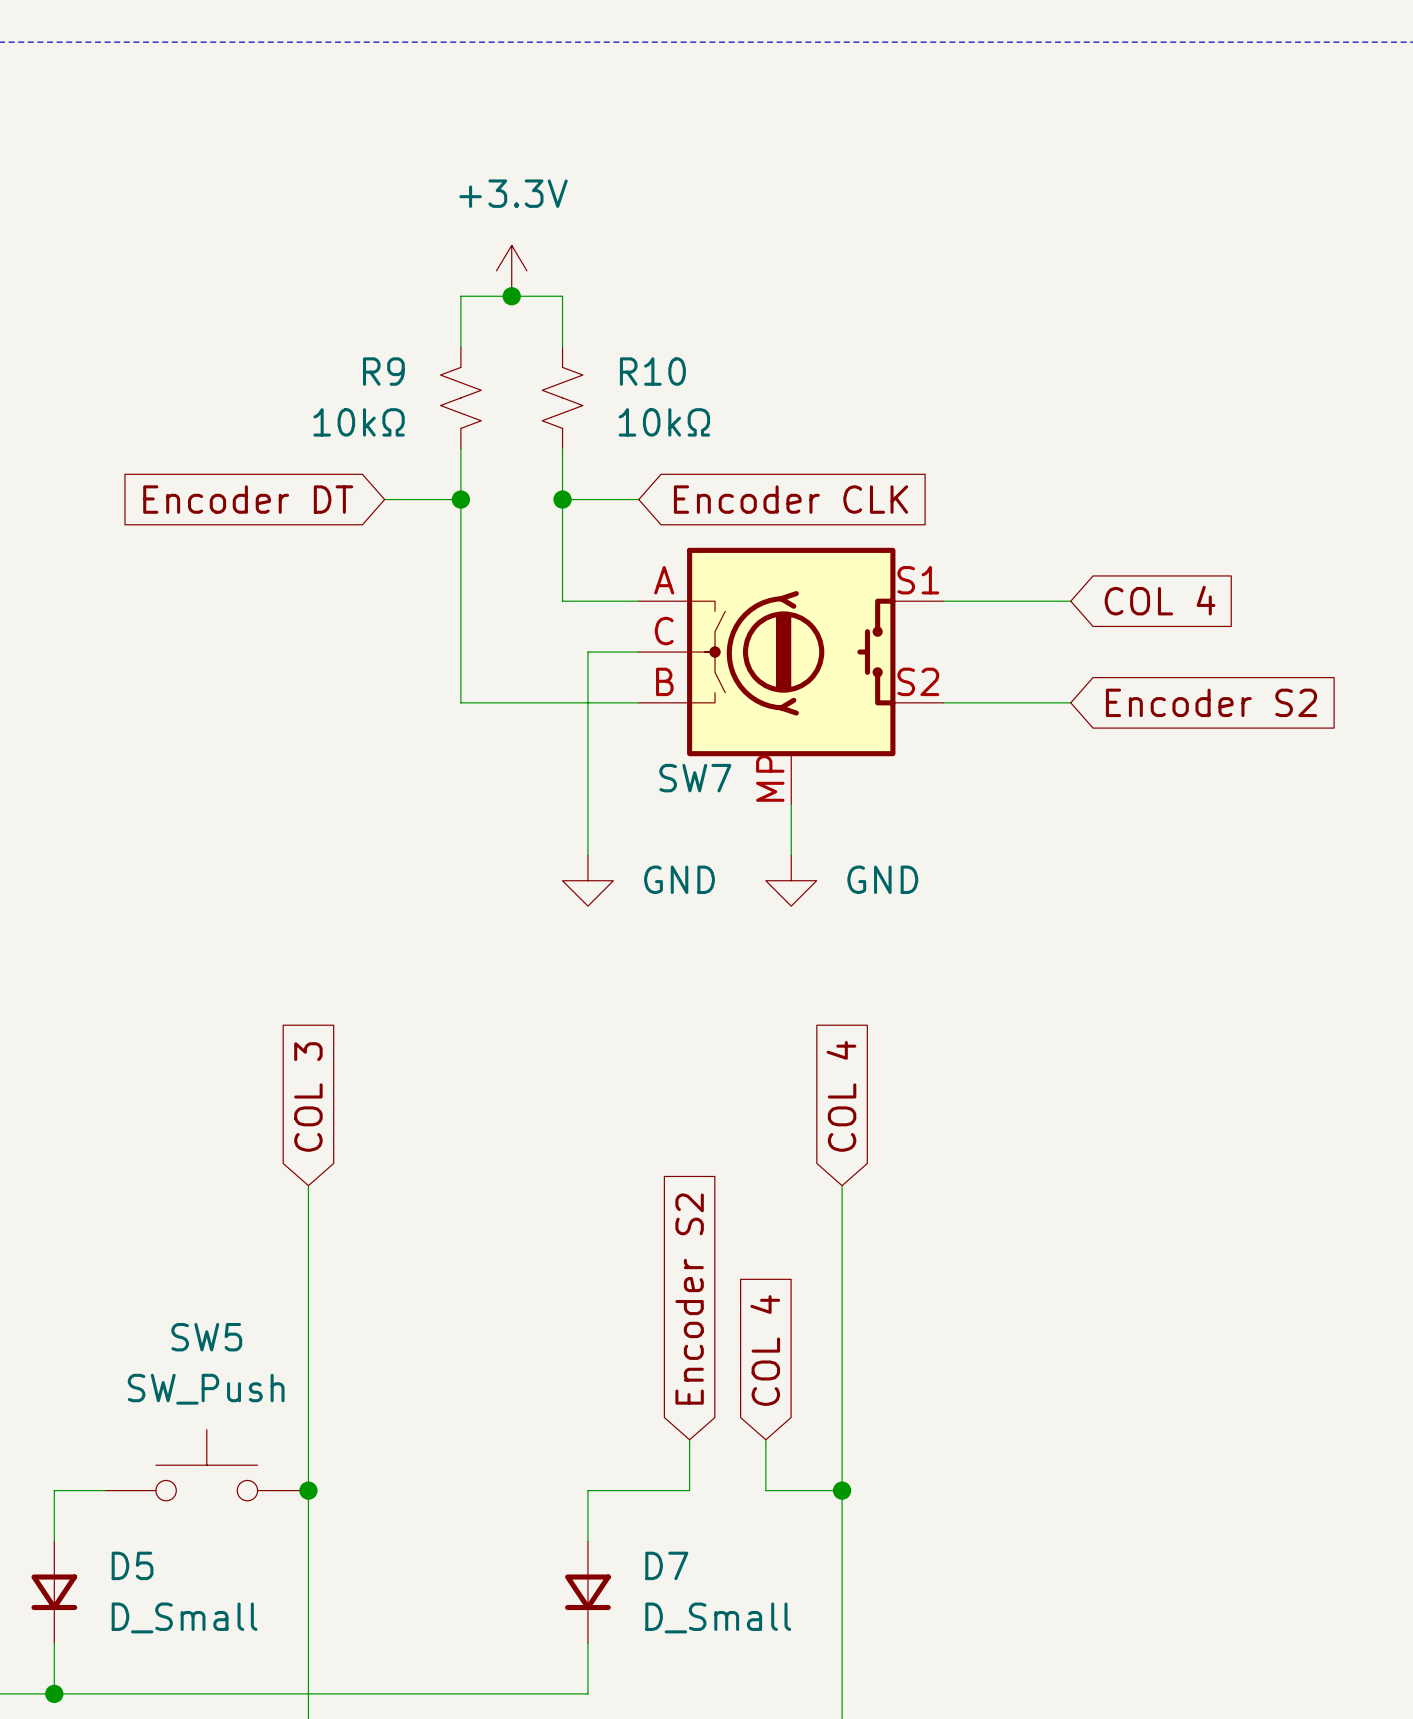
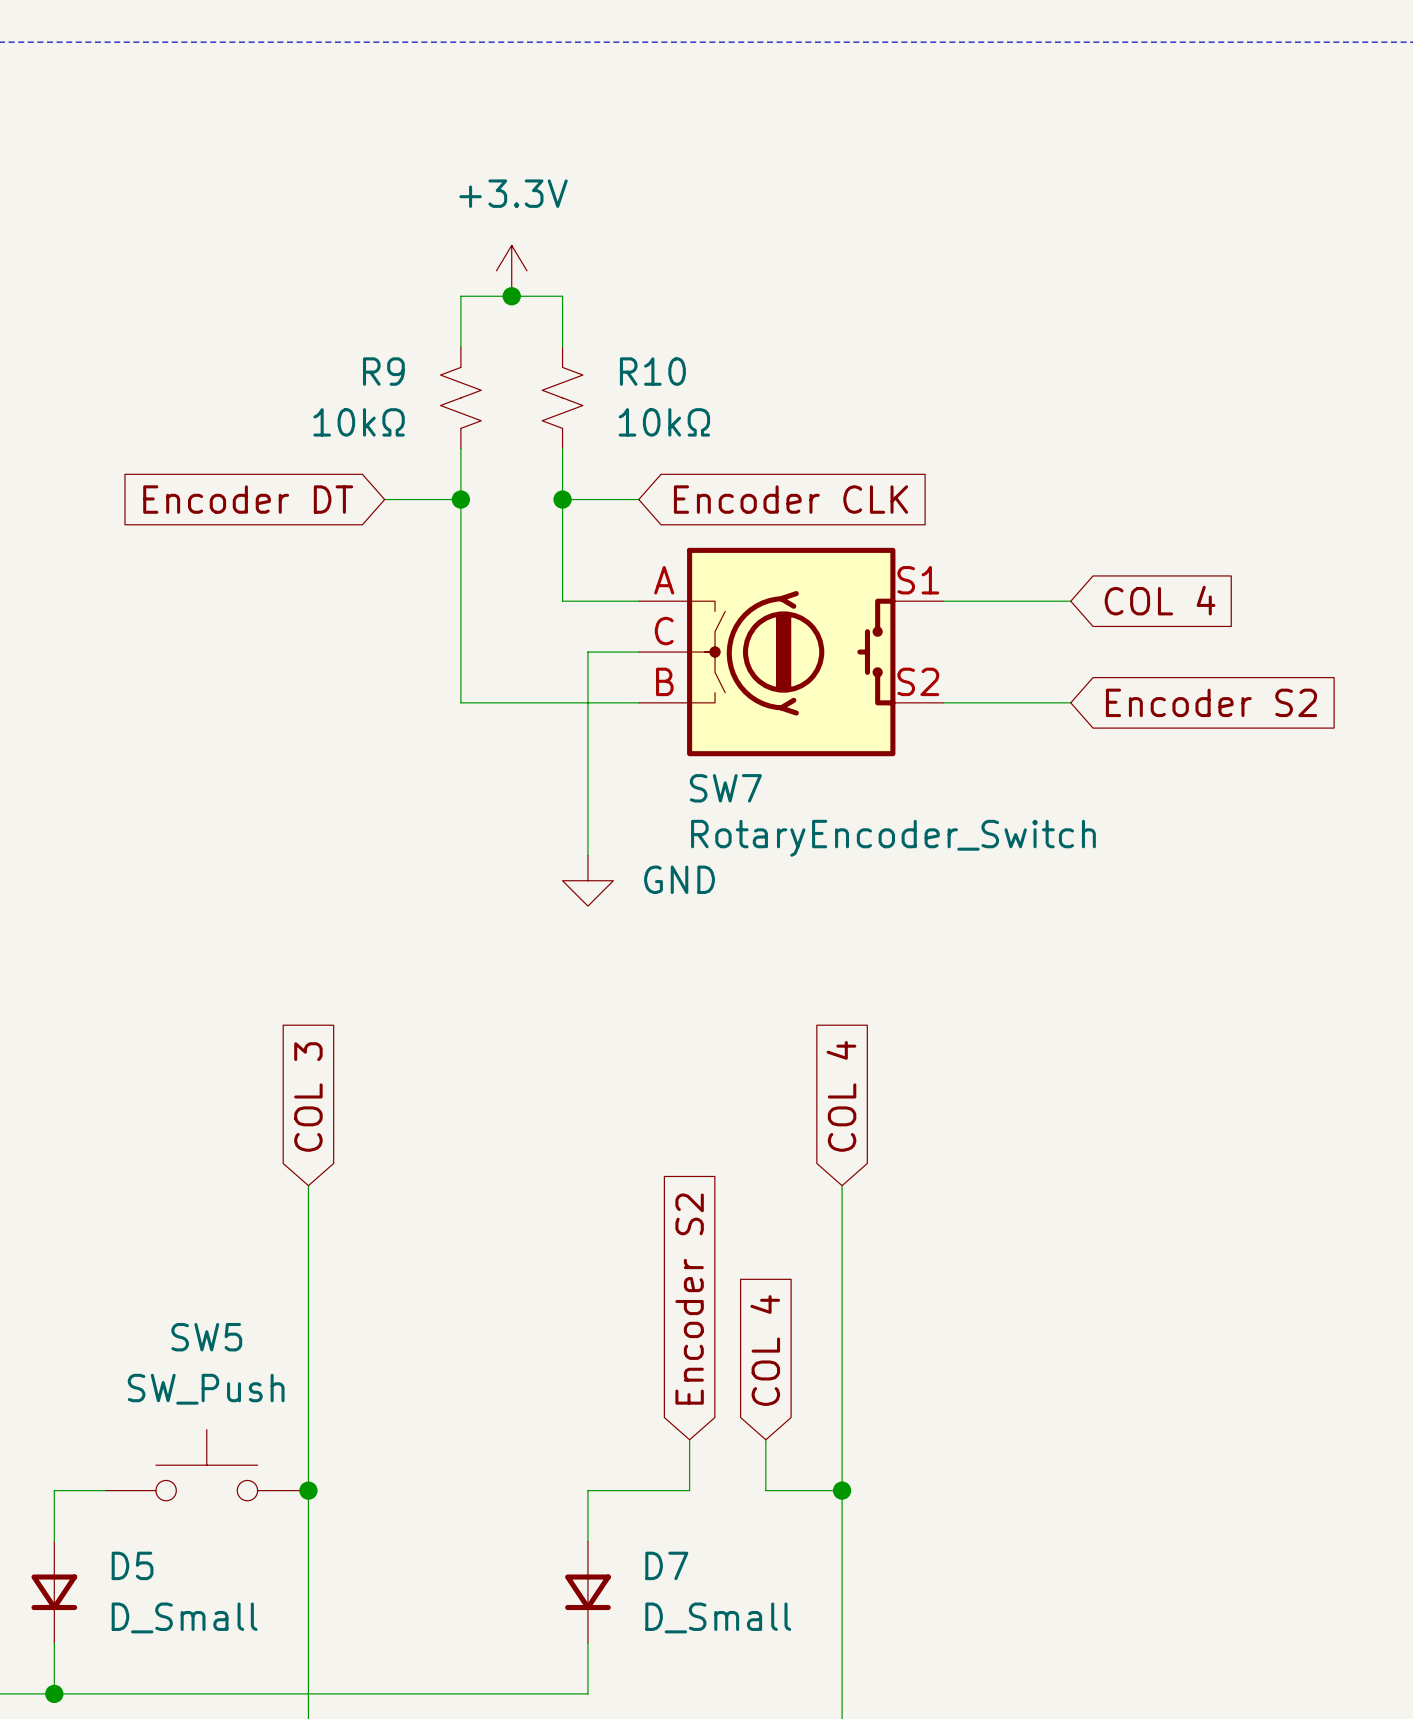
SW7 symbol: [638, 547, 944, 805] -> [638, 547, 944, 757]
SW7 name position: SW7 (695, 778) -> SW7 (725, 788)
wire: (791, 804) (791, 855) -> none
SW7 value: none -> RotaryEncoder_Switch (893, 838)
power symbol: GND (791, 880) -> none

